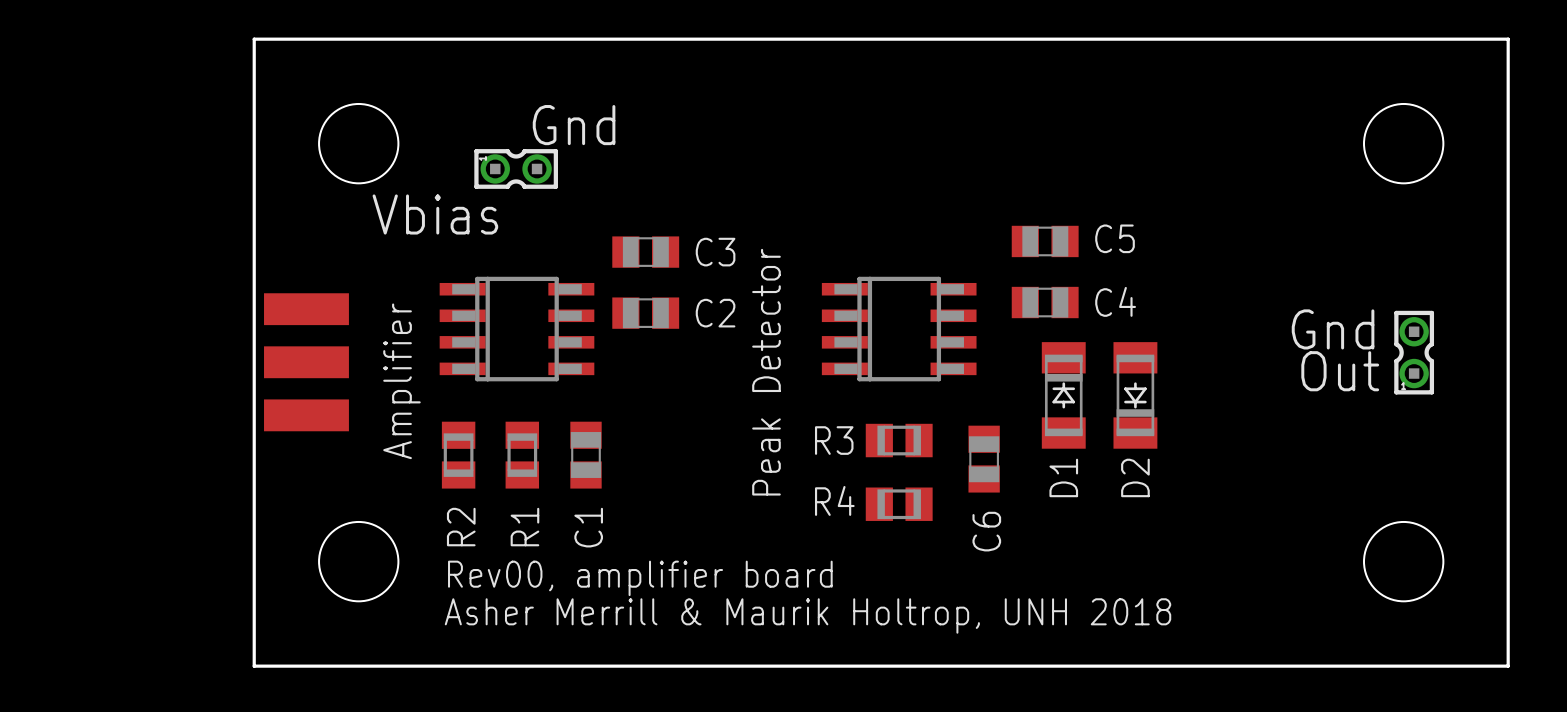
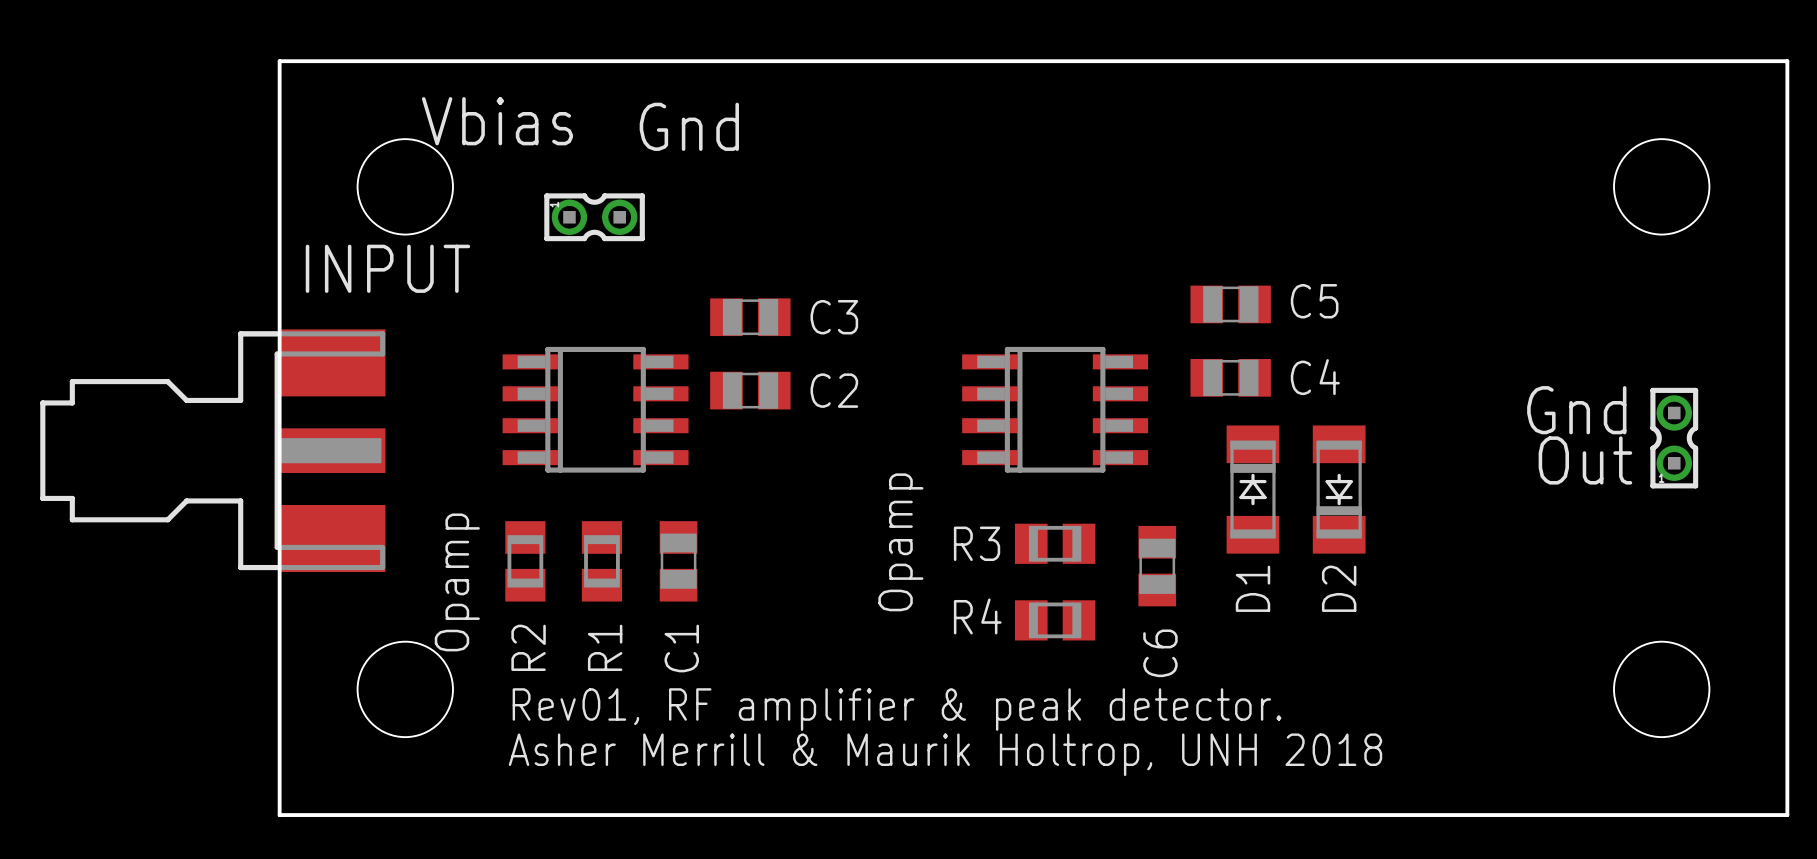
text position: Gnd (574, 125) -> Gnd (689, 126)
text position: Vbias (435, 214) -> Vbias (497, 121)
part: (306, 362) -> none
INPUT: none -> (212, 450)
part value: Peak Detector (766, 372) -> Opamp (900, 542)
part value: Amplifier (401, 381) -> Opamp (457, 582)
text: Rev00, amplifier board (640, 578) -> Rev01, RF amplifier & peak detector. (897, 709)

